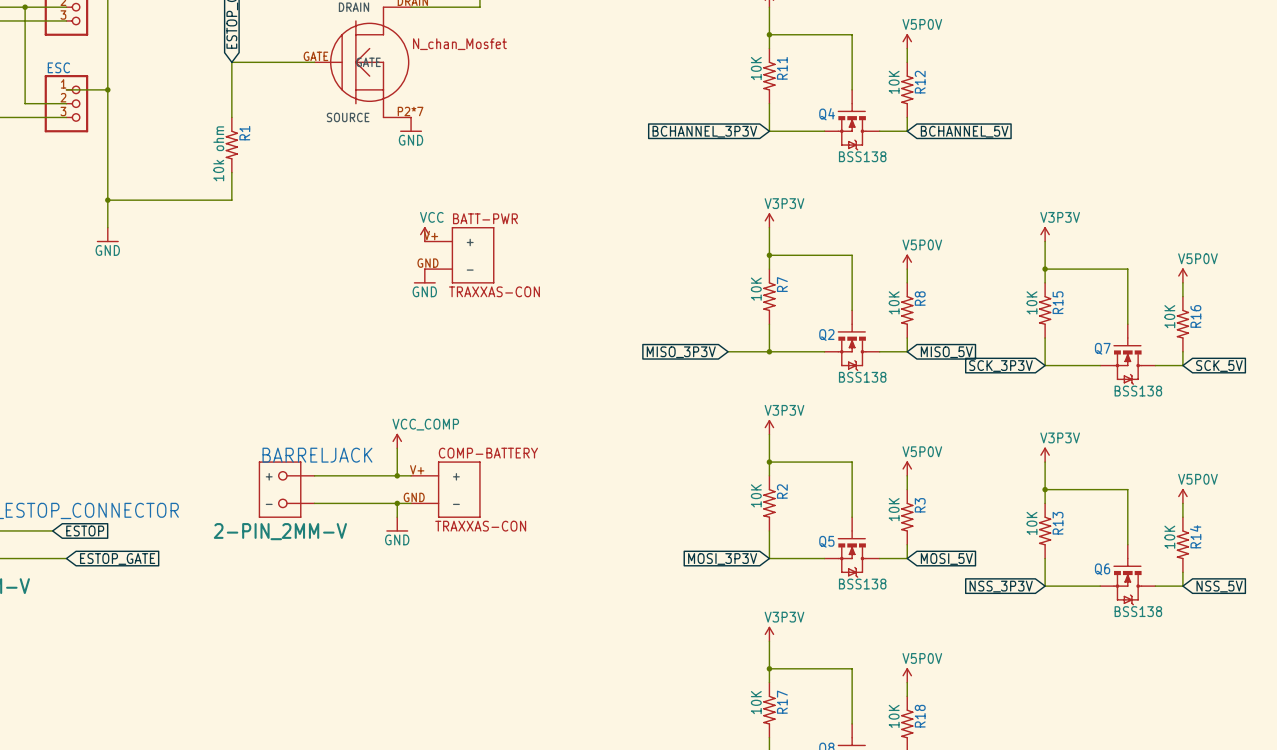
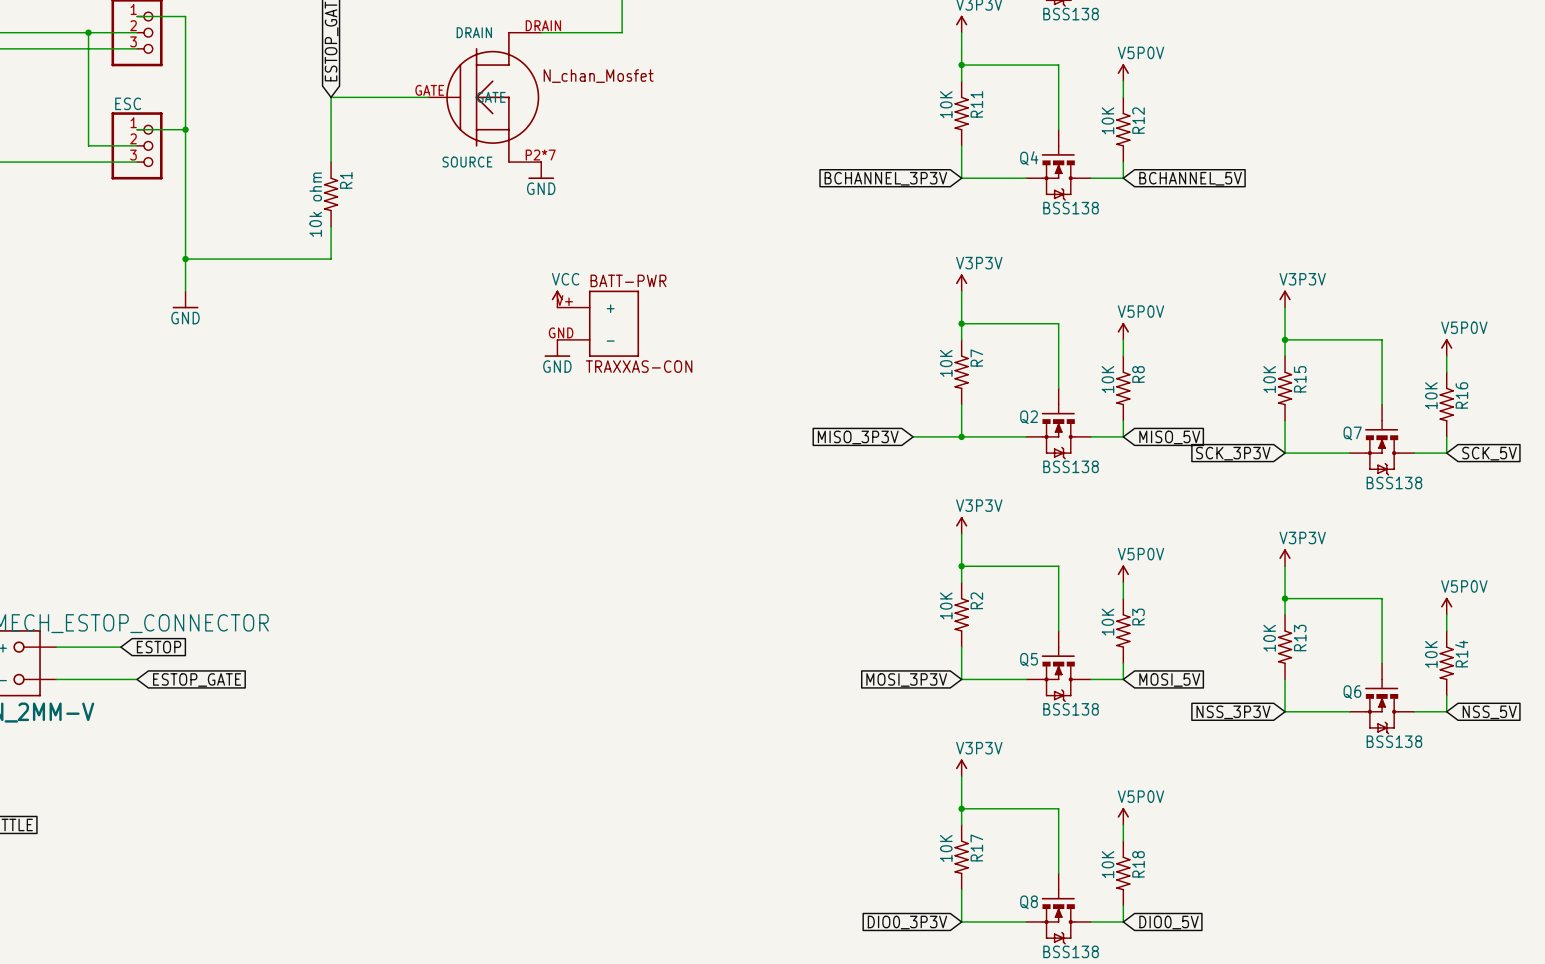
power symbol: VCC_COMP (397, 441) -> none
wire: (397, 448) (397, 475) -> none
wire: (314, 475) (411, 475) -> none
junction: (397, 475) -> none
BARRELJACK: 2-PIN_2MM-V (286, 489) -> none
COMP-BATTERY: TRAXXAS-CON (445, 489) -> none
wire: (314, 503) (411, 503) -> none
wire: (397, 503) (397, 517) -> none
junction: (397, 503) -> none
power symbol: GND (397, 524) -> none

